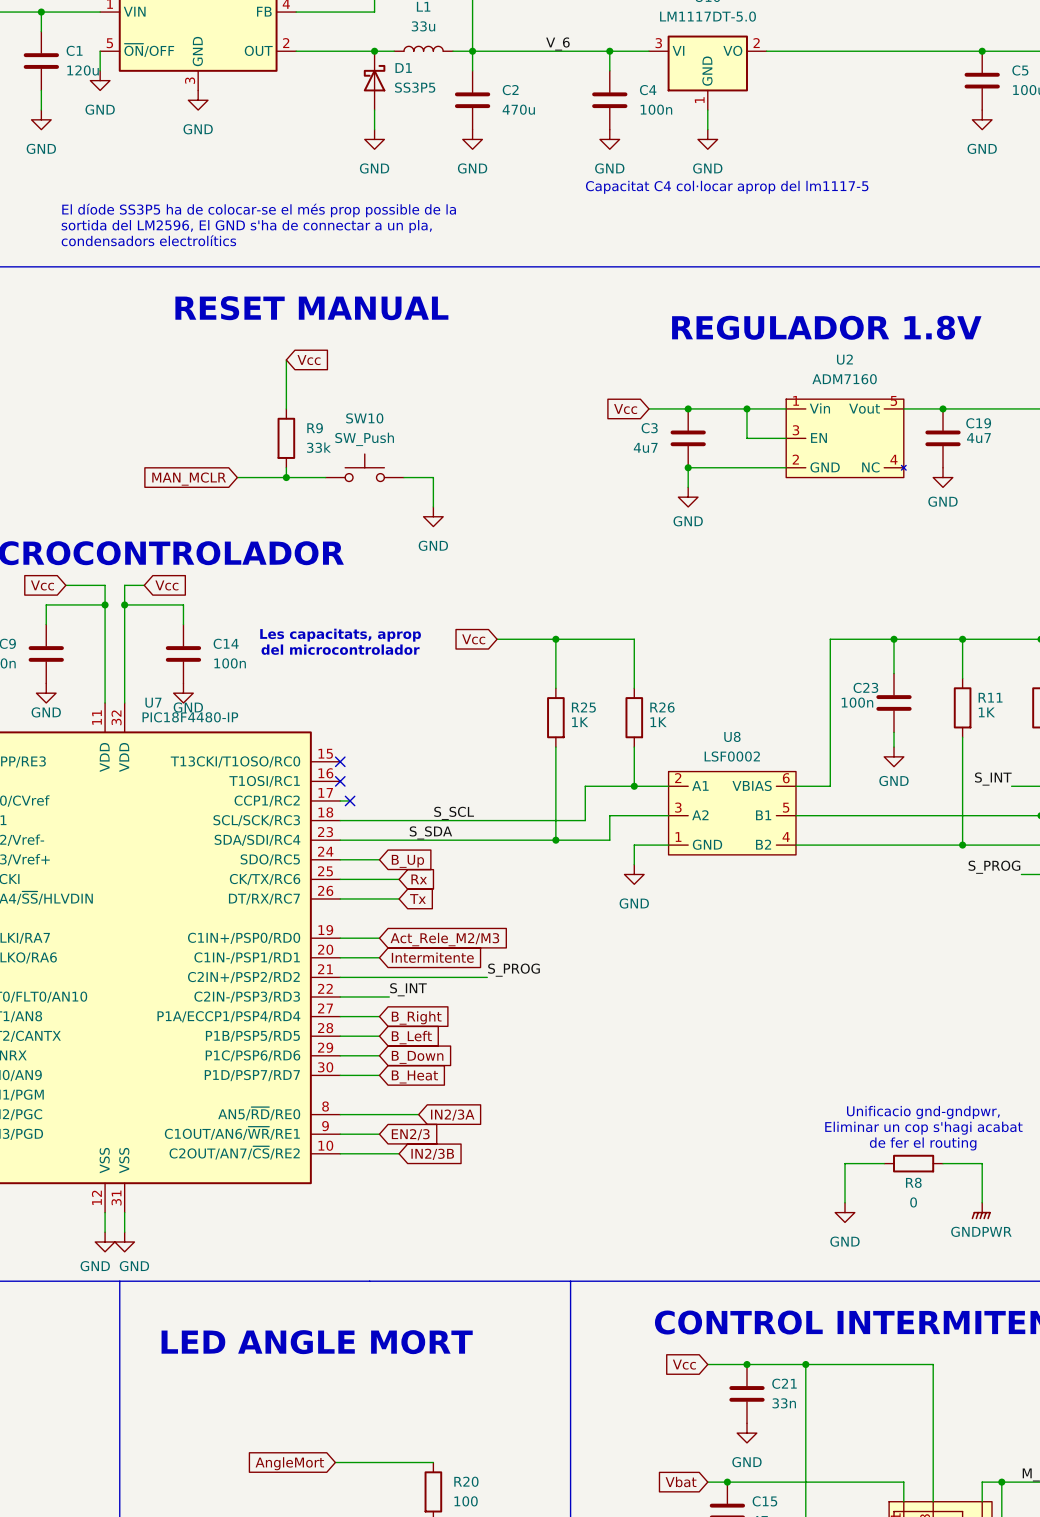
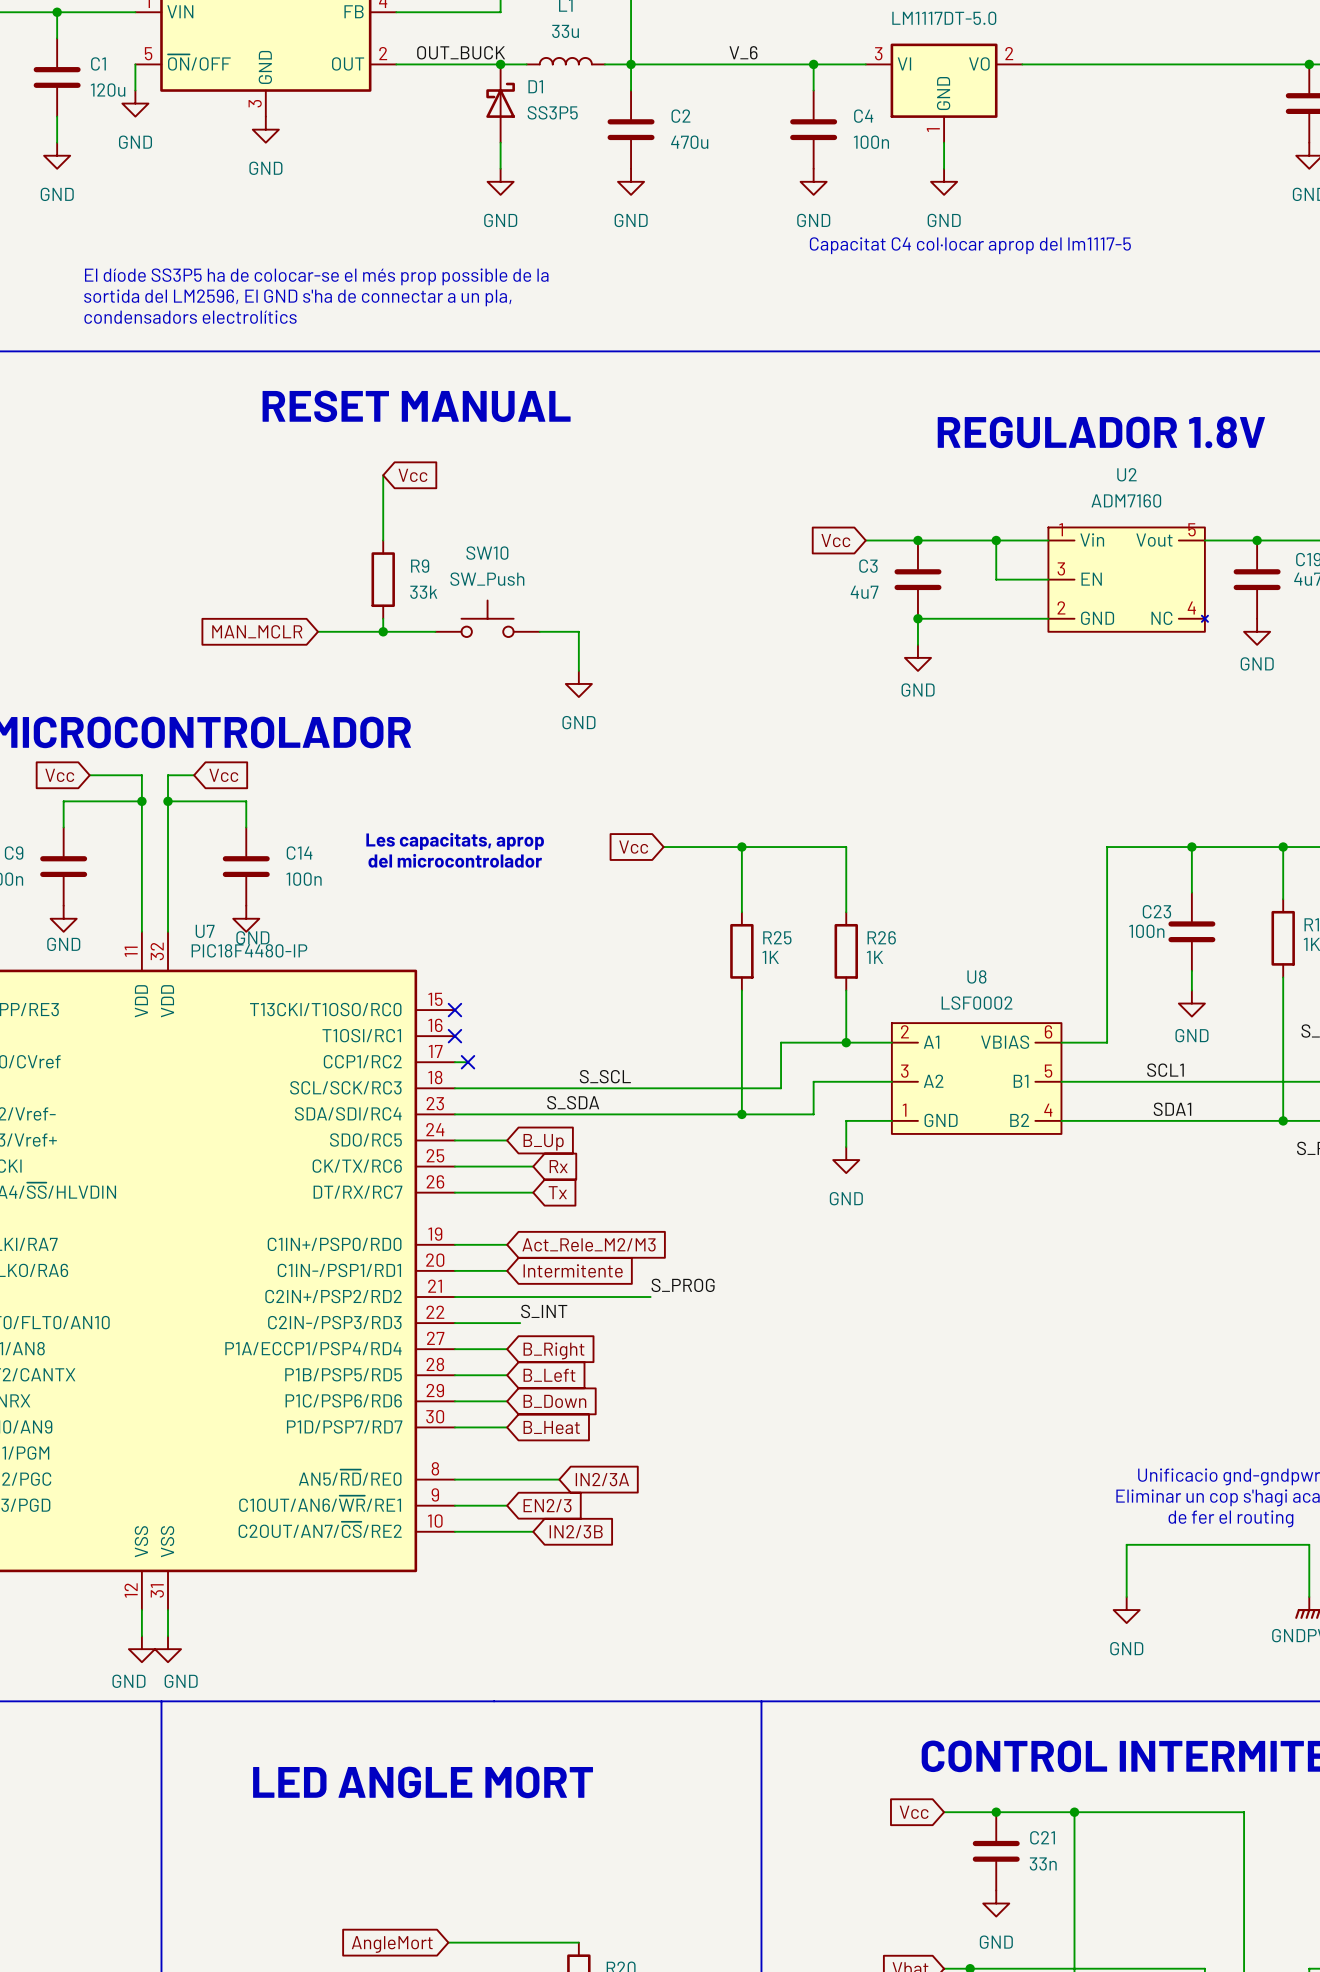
label: none -> OUT_BUCK (461, 52)
label: none -> SCL1 (1165, 1070)
label: none -> SDA1 (1172, 1109)
wire: none -> (1178, 1544) (1257, 1544)
R8: 0 (913, 1163) -> none

